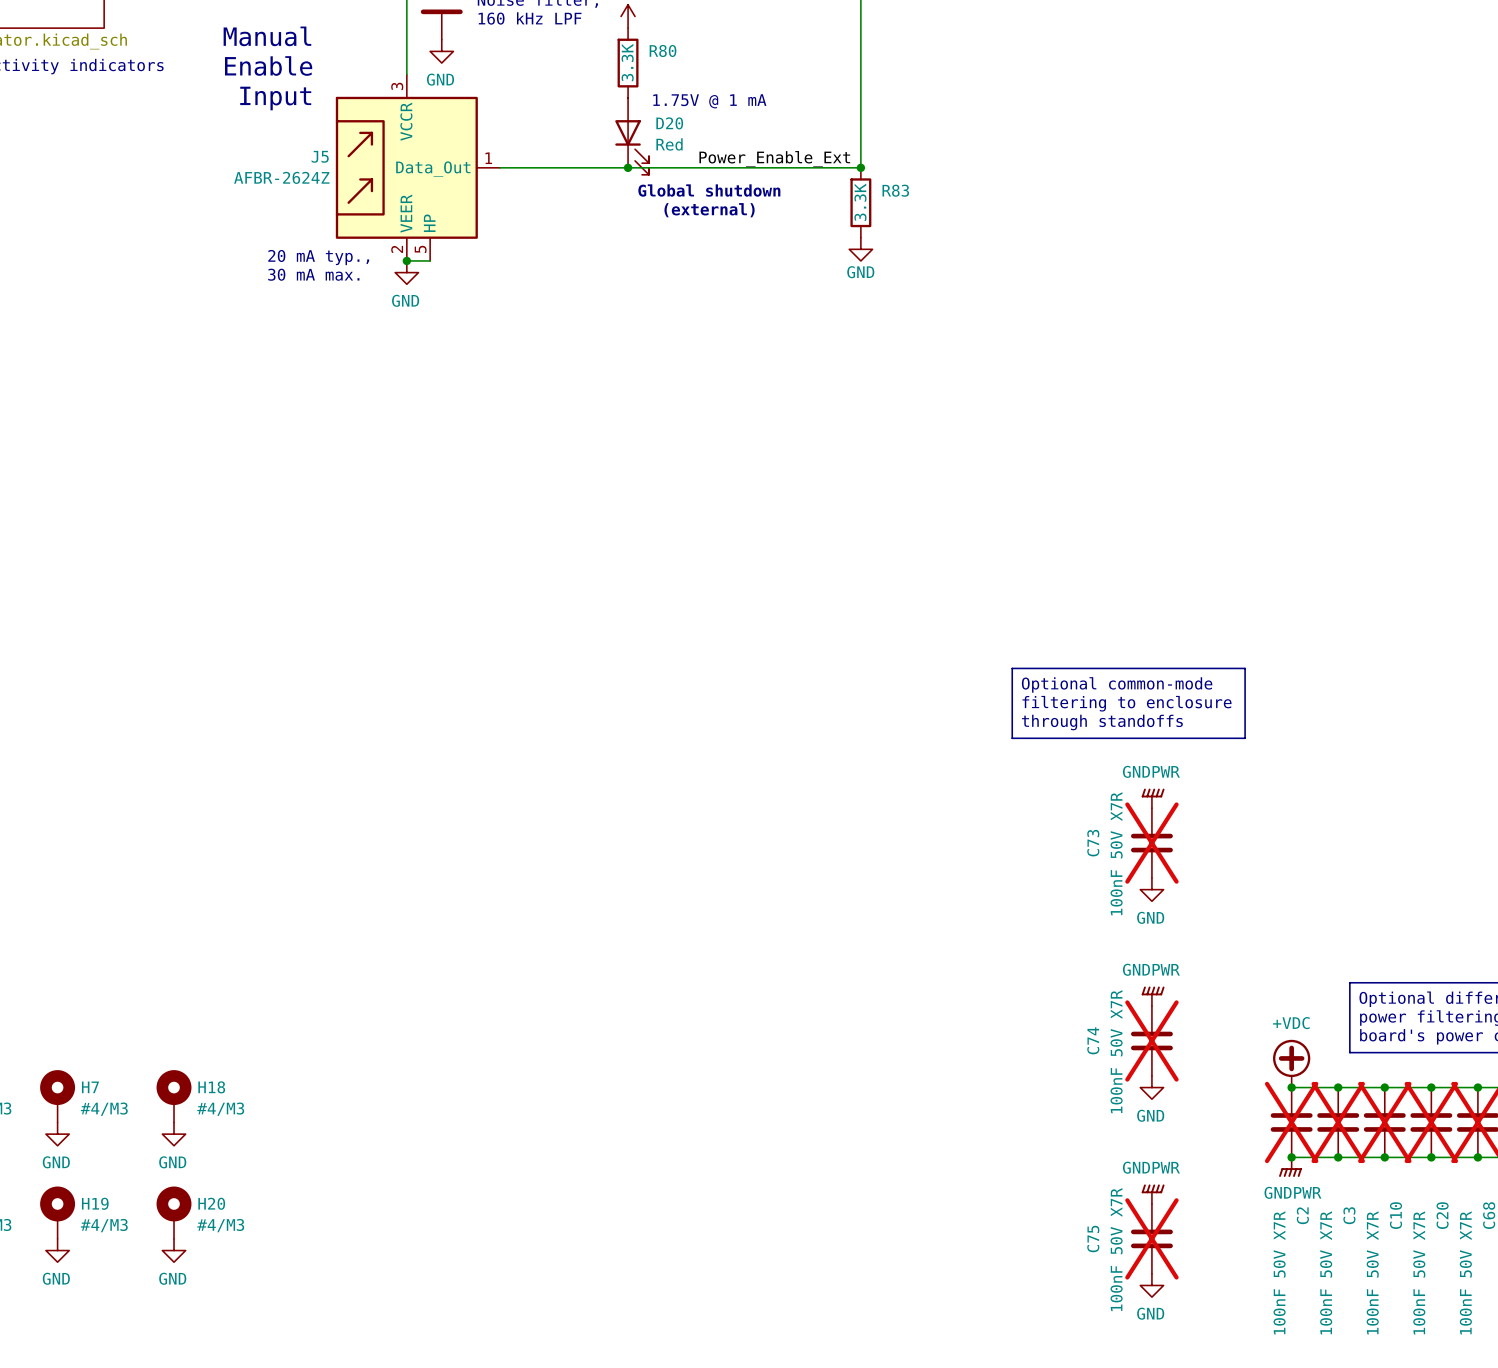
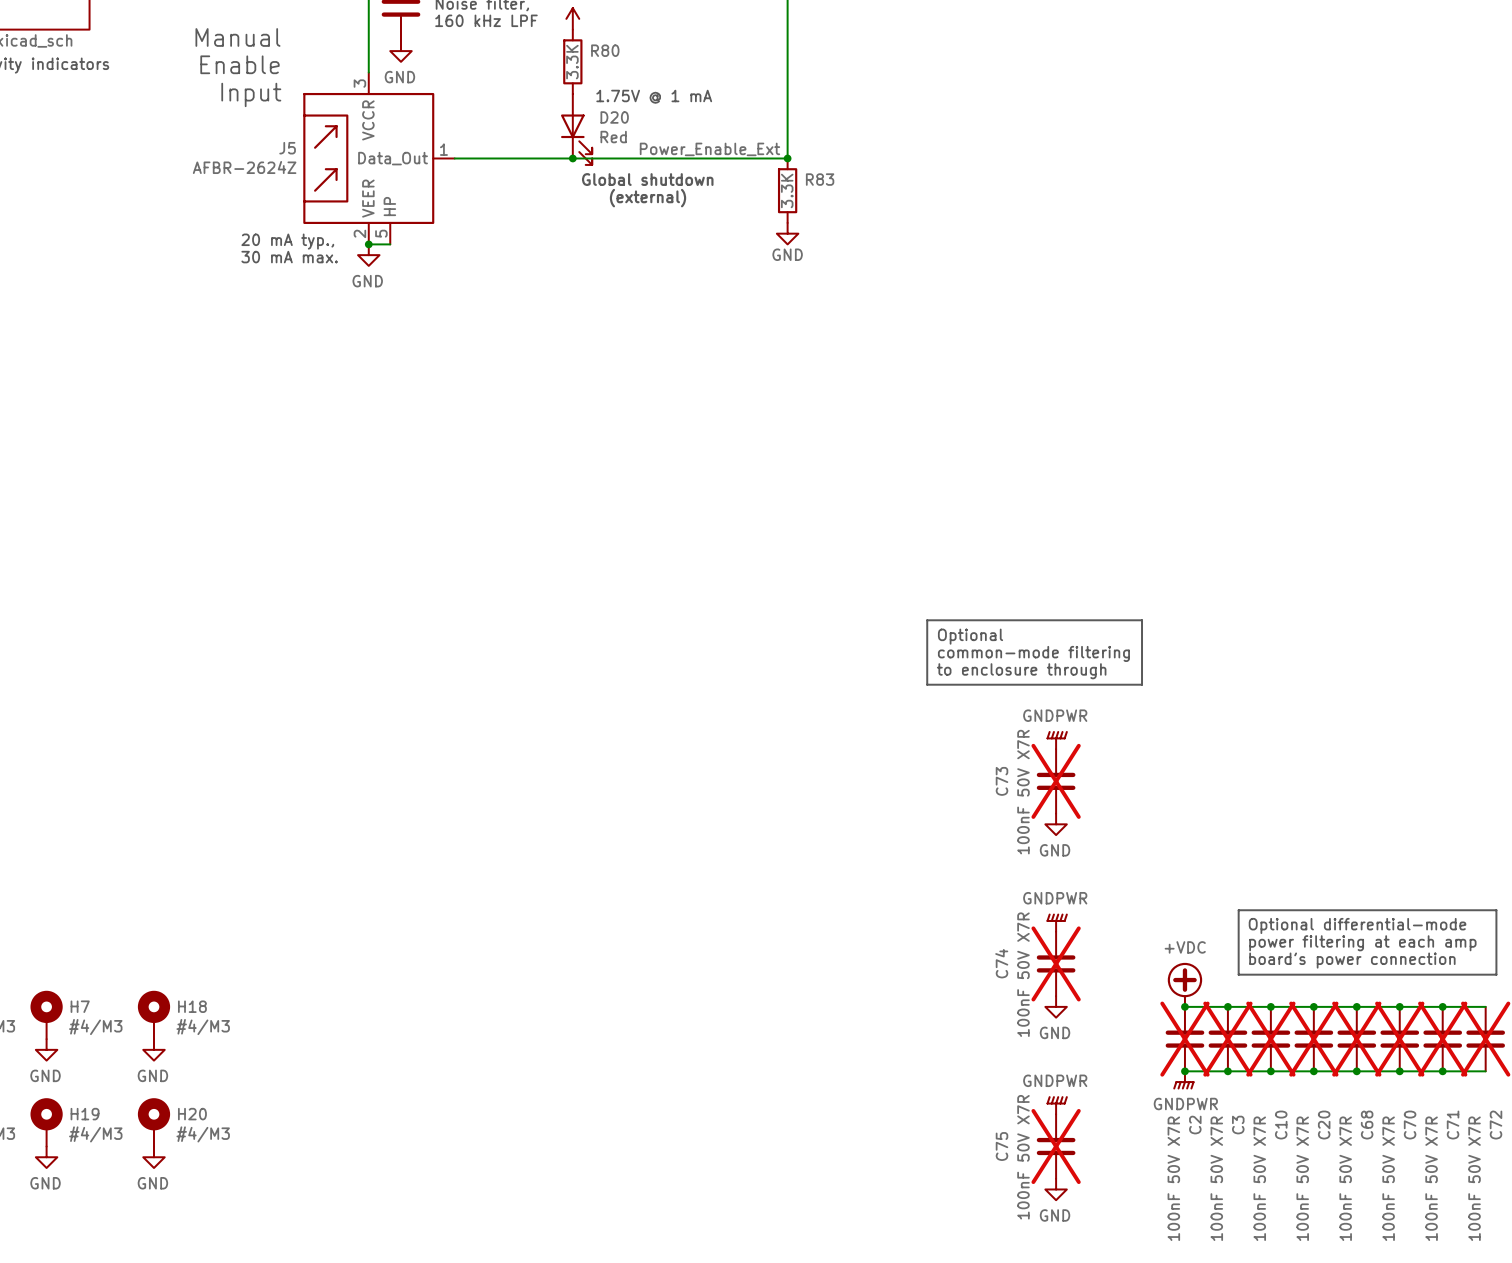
text: Optional common-mode (1117, 684) -> Optional (970, 636)
text: filtering to enclosure (1127, 703) -> common-mode filtering (1033, 653)
text: through standoffs (1102, 722) -> to enclosure through (1021, 671)

